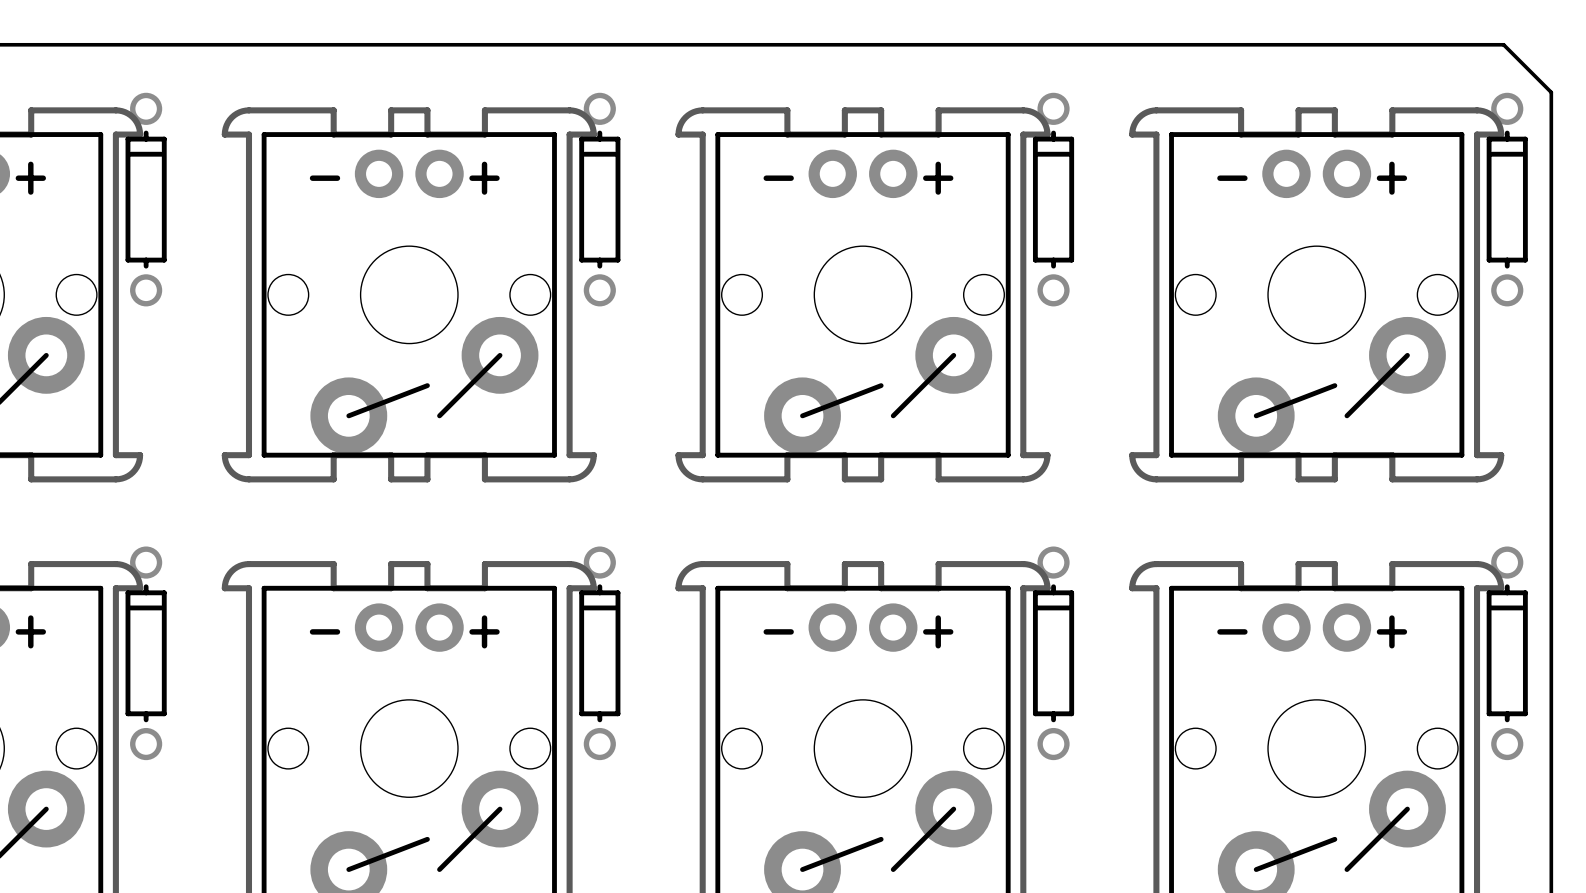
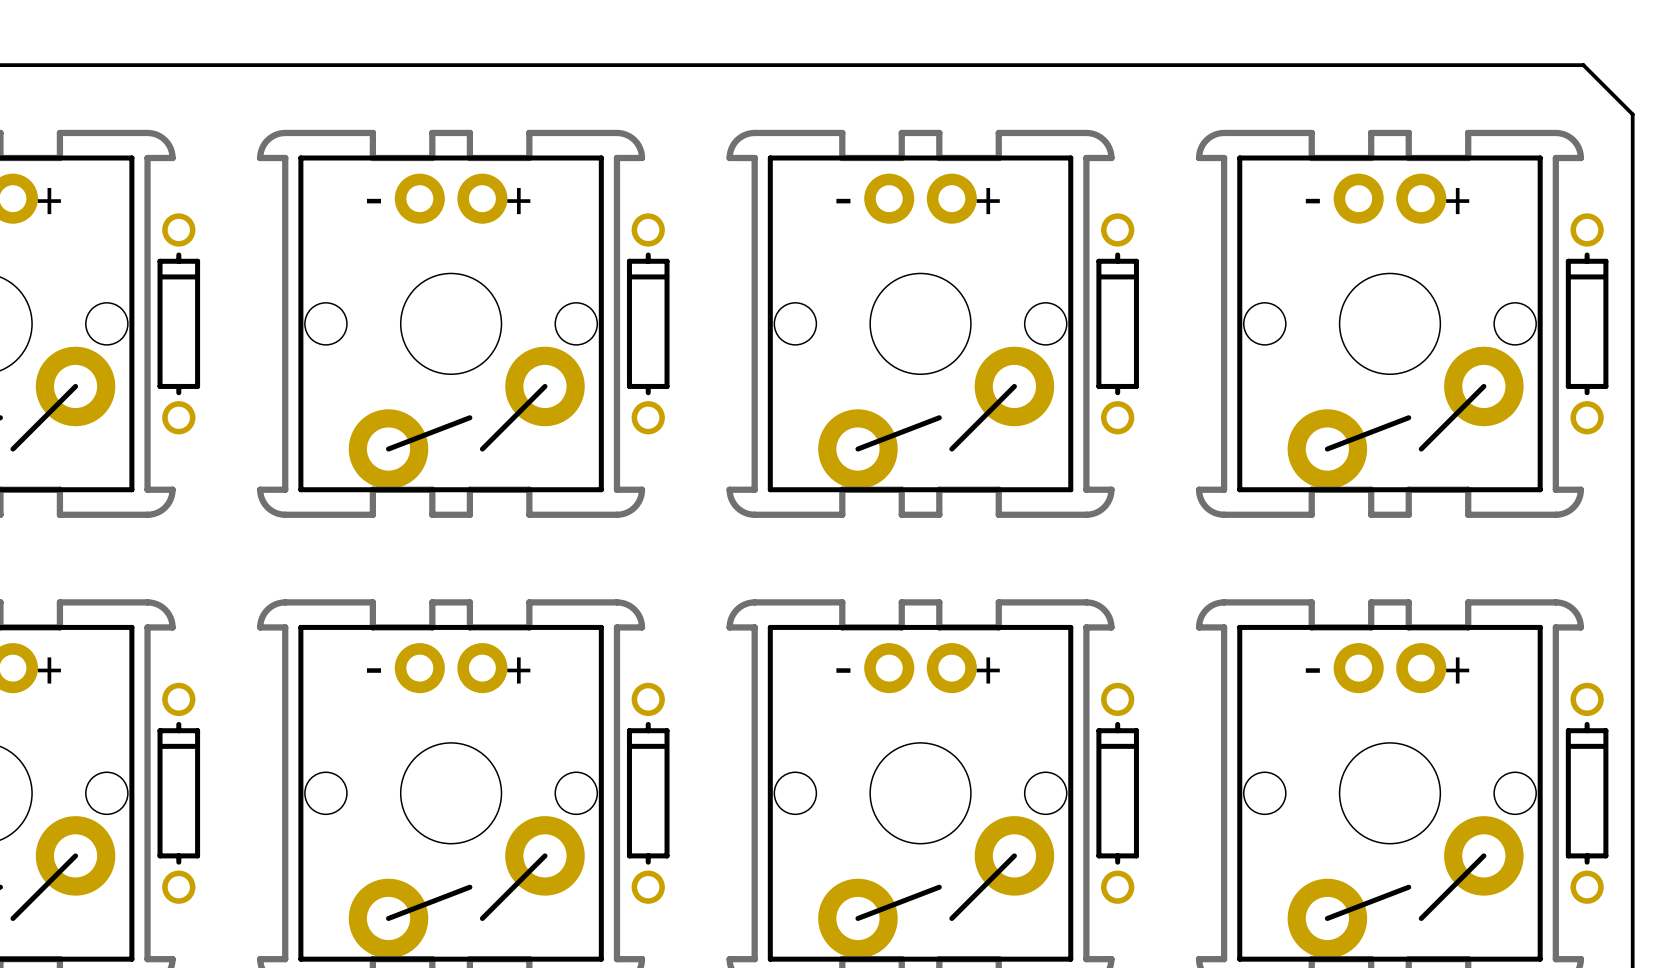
part position: (146, 199) -> (178, 323)
part position: (599, 199) -> (648, 323)
part position: (1053, 199) -> (1117, 323)
part position: (1507, 199) -> (1587, 323)
part position: (146, 653) -> (178, 793)
part position: (599, 653) -> (648, 793)
part position: (1053, 653) -> (1117, 793)
part position: (1507, 653) -> (1587, 793)

